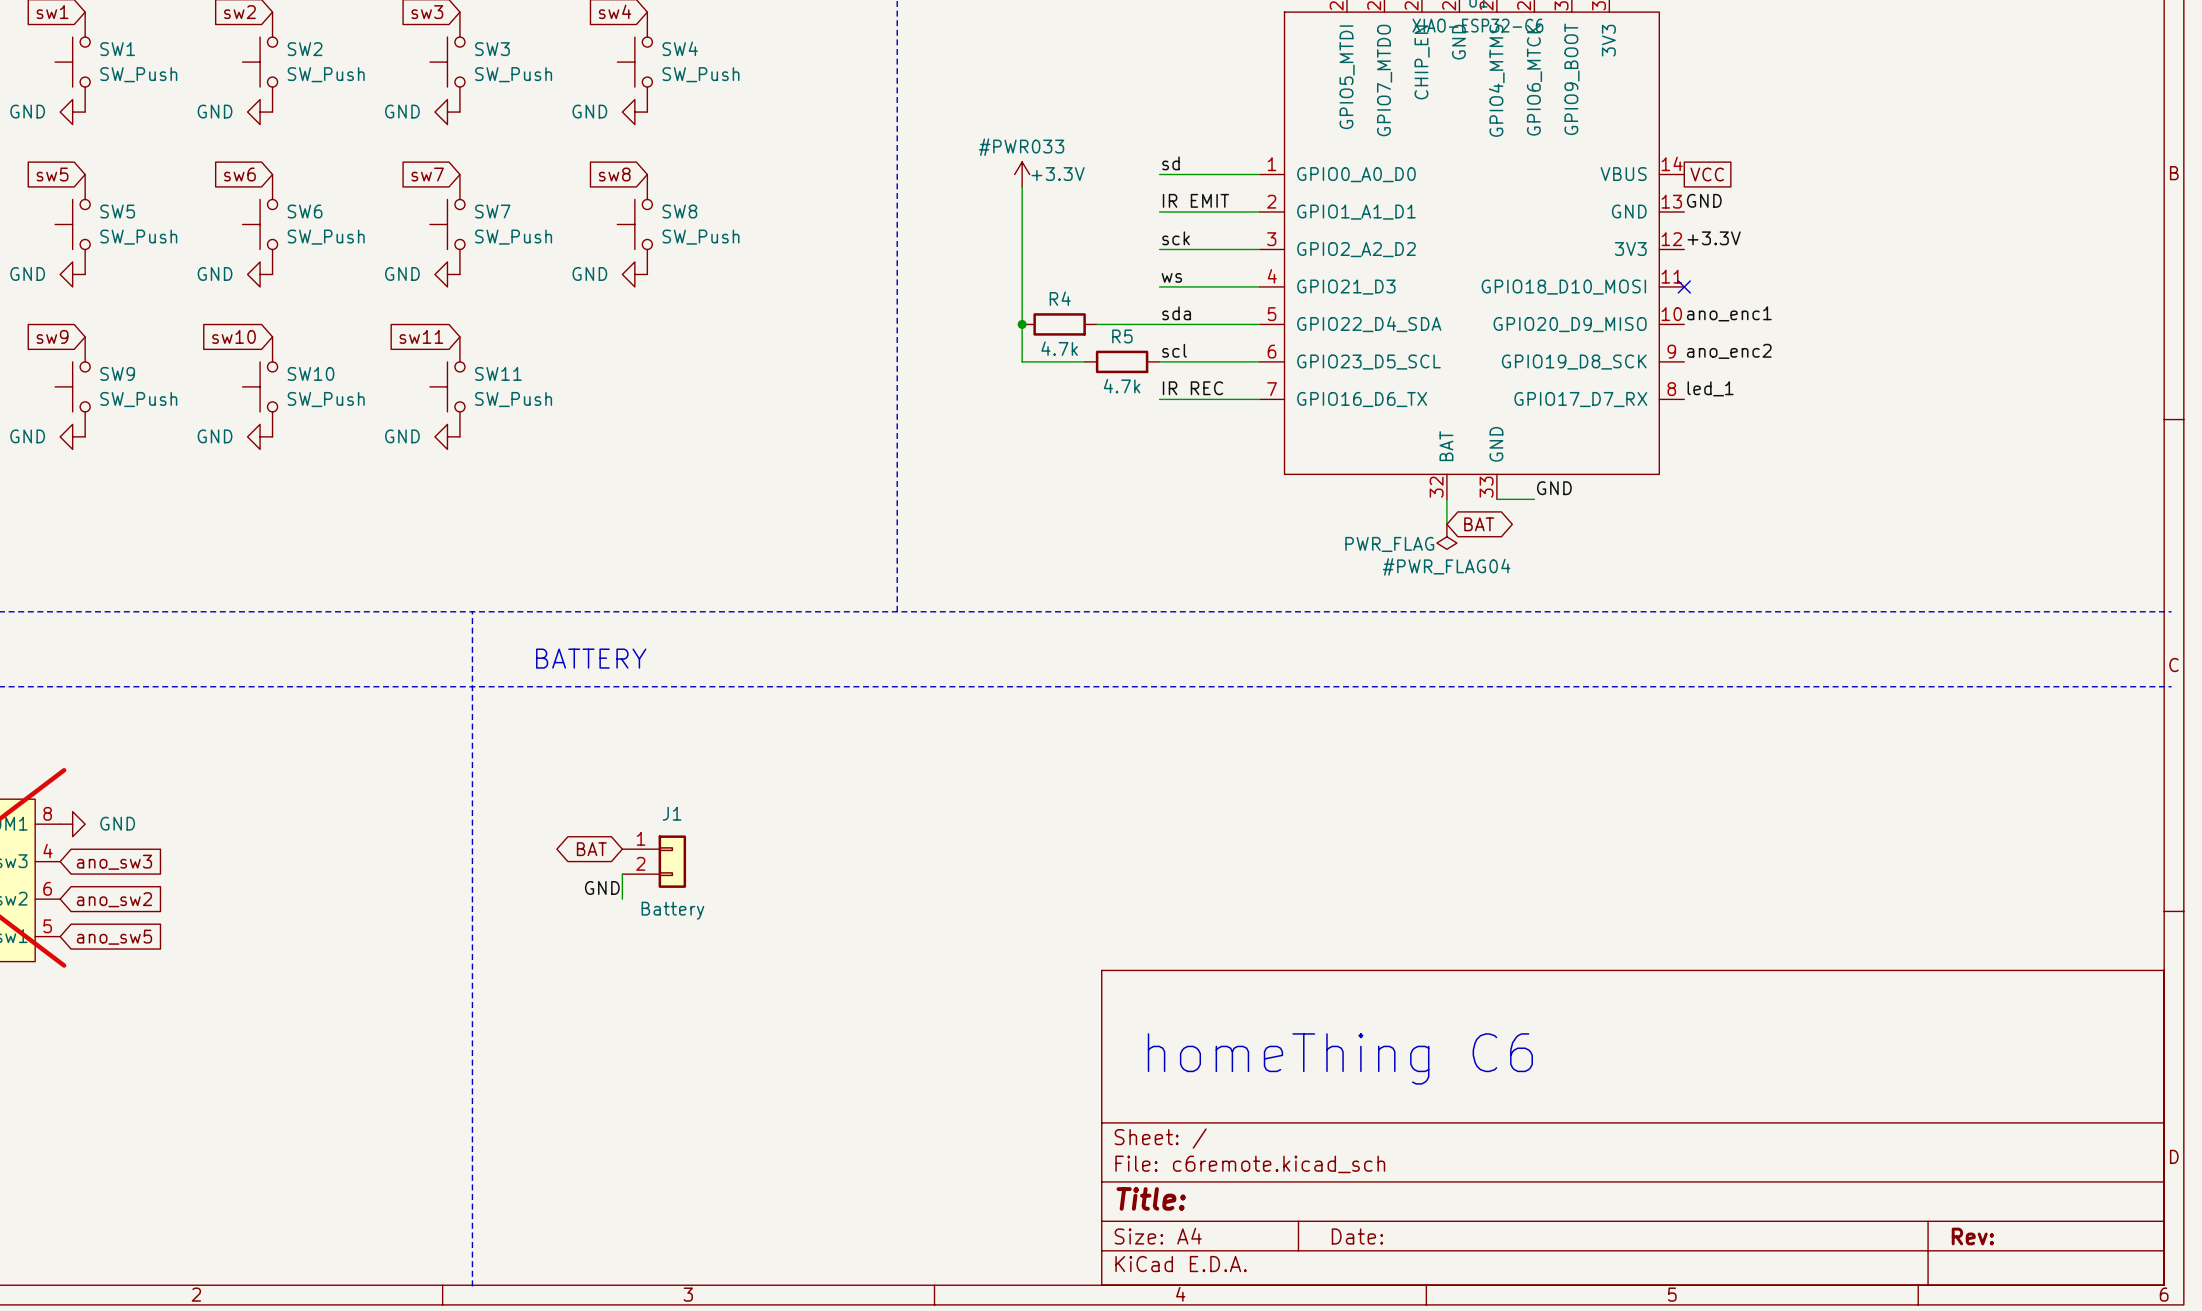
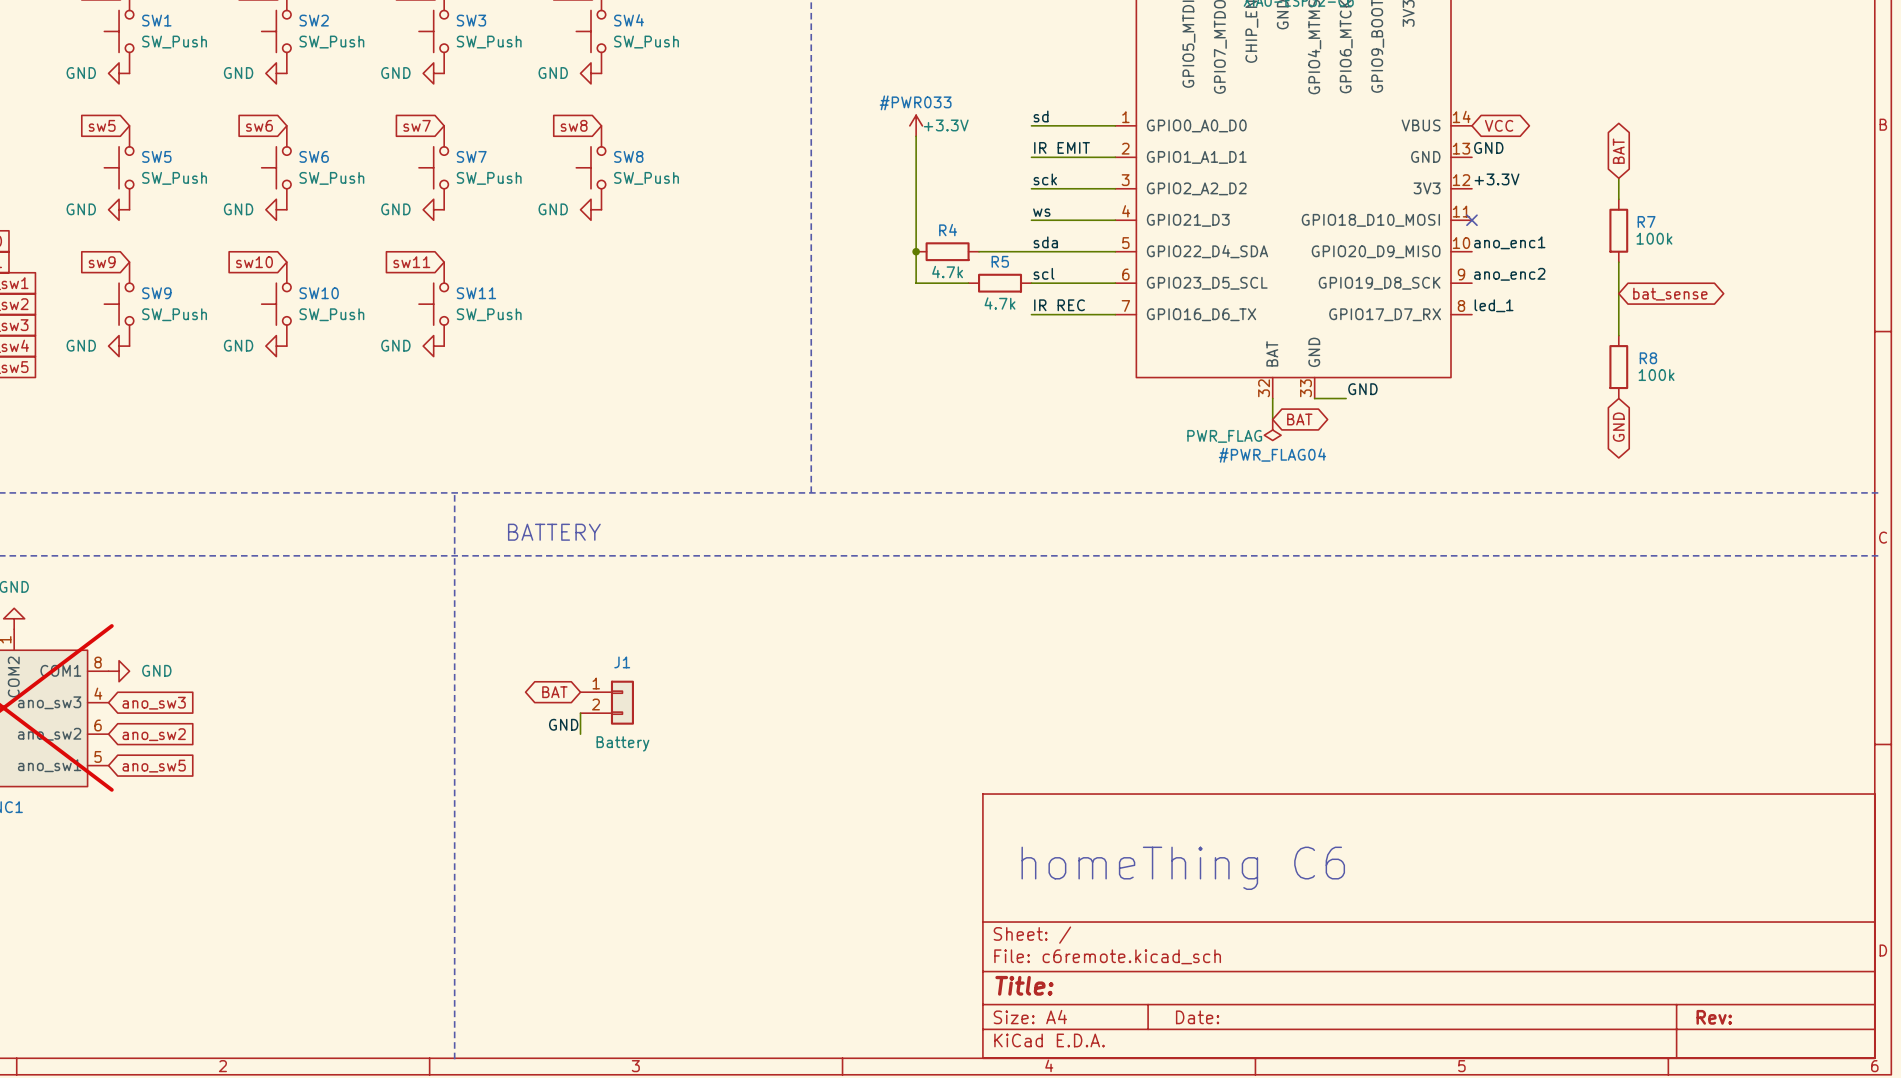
global label shape: passive (1707, 174) -> bidirectional (1499, 125)
global label: none -> BAT (1618, 151)
wire: none -> (1618, 178) (1618, 199)
R7: none -> 100k (1618, 230)
wire: none -> (1618, 262) (1618, 335)
global label: none -> bat_sense (1670, 294)
R8: none -> 100k (1618, 367)
global label: none -> GND (1618, 427)

